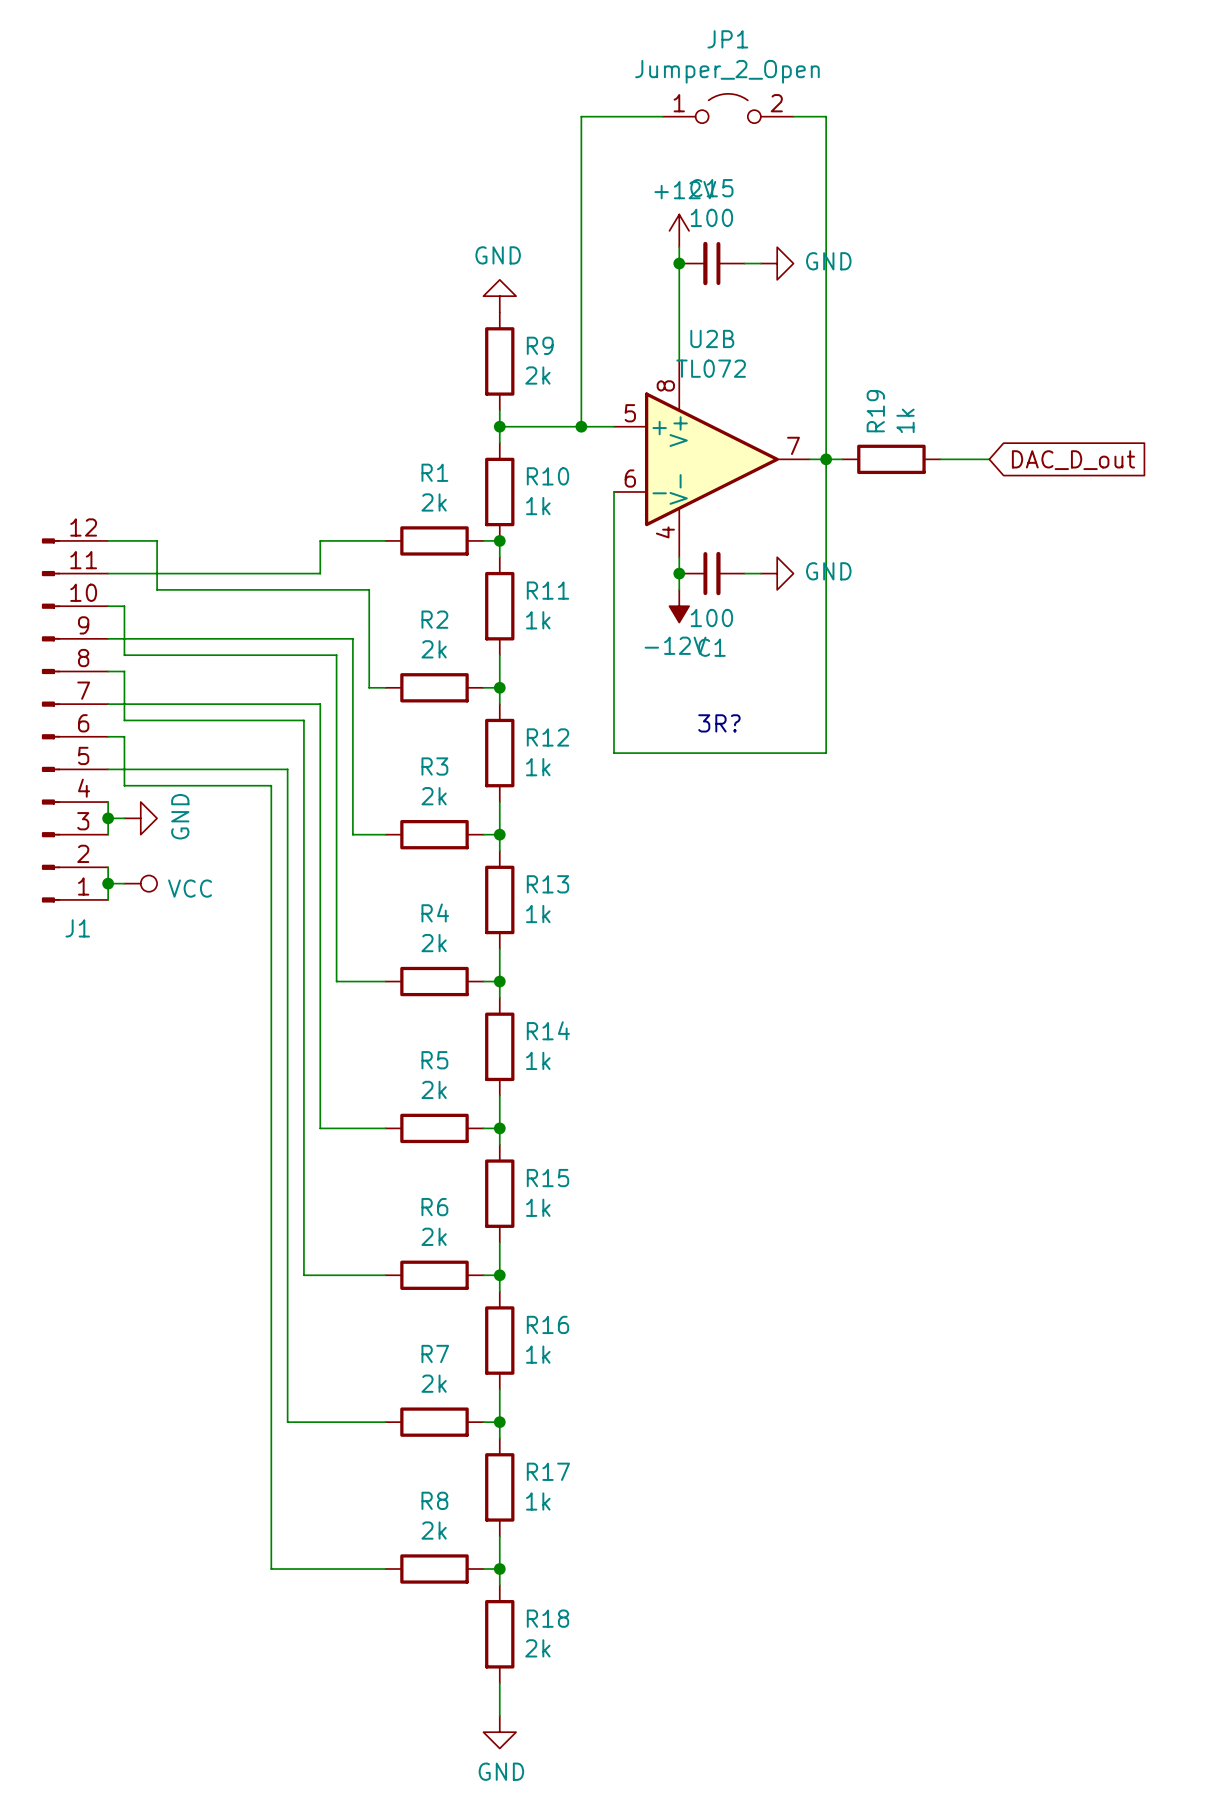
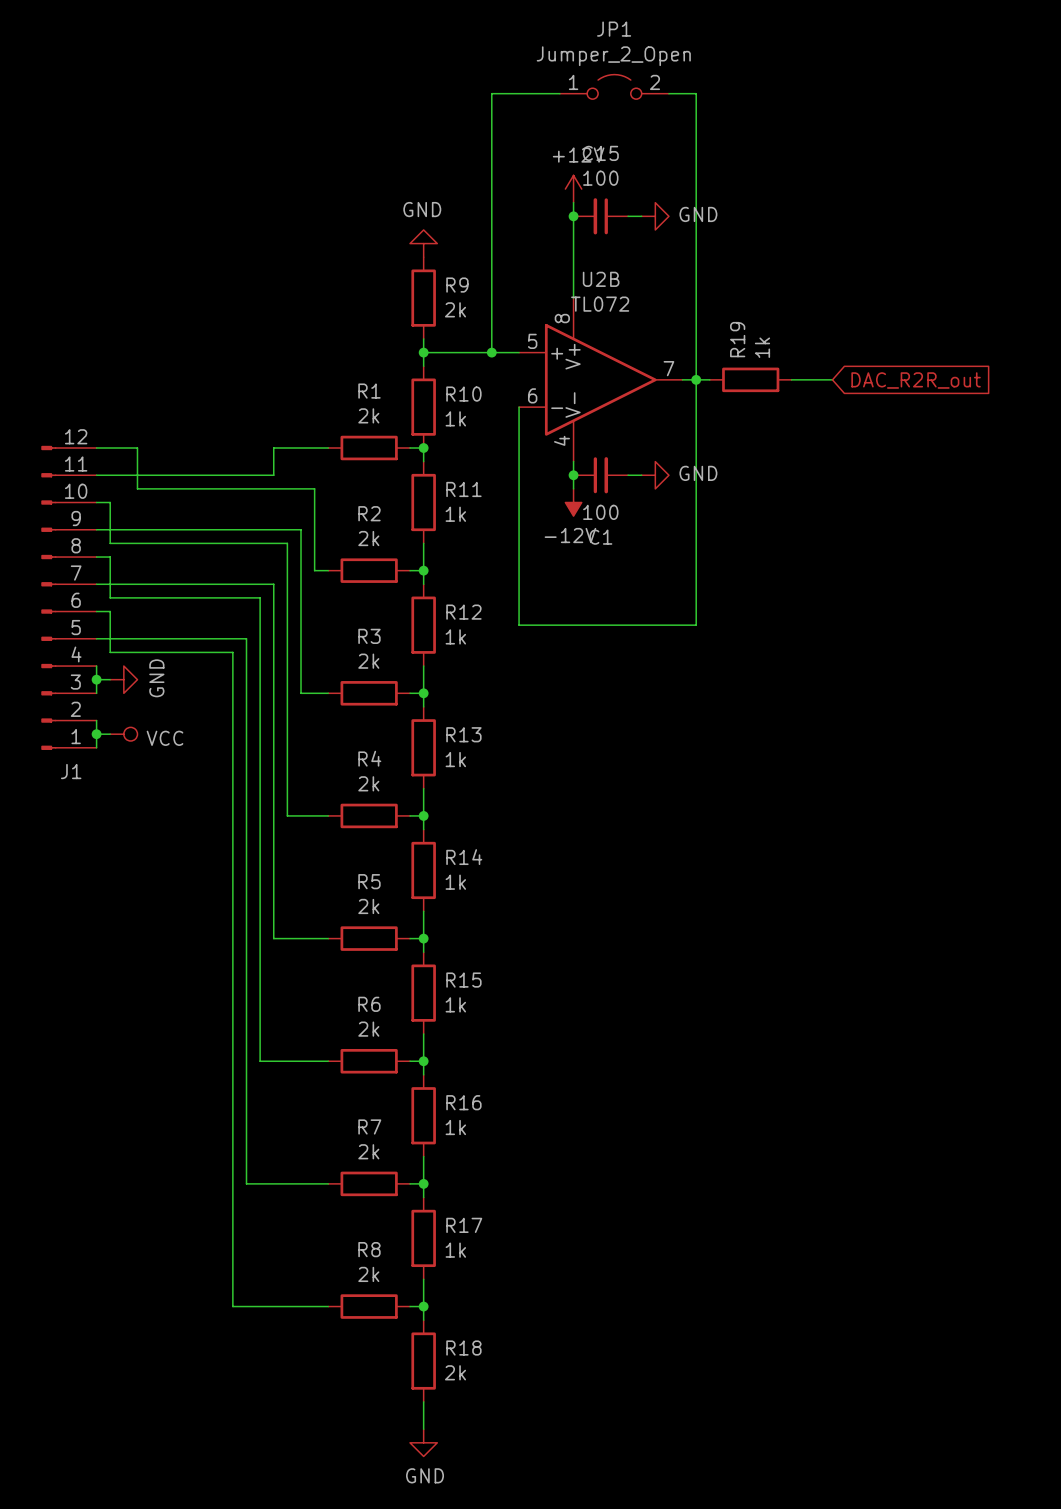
global label: DAC_D_out (1073, 460) -> DAC_R2R_out (916, 380)
text: 3R? (719, 723) -> none

